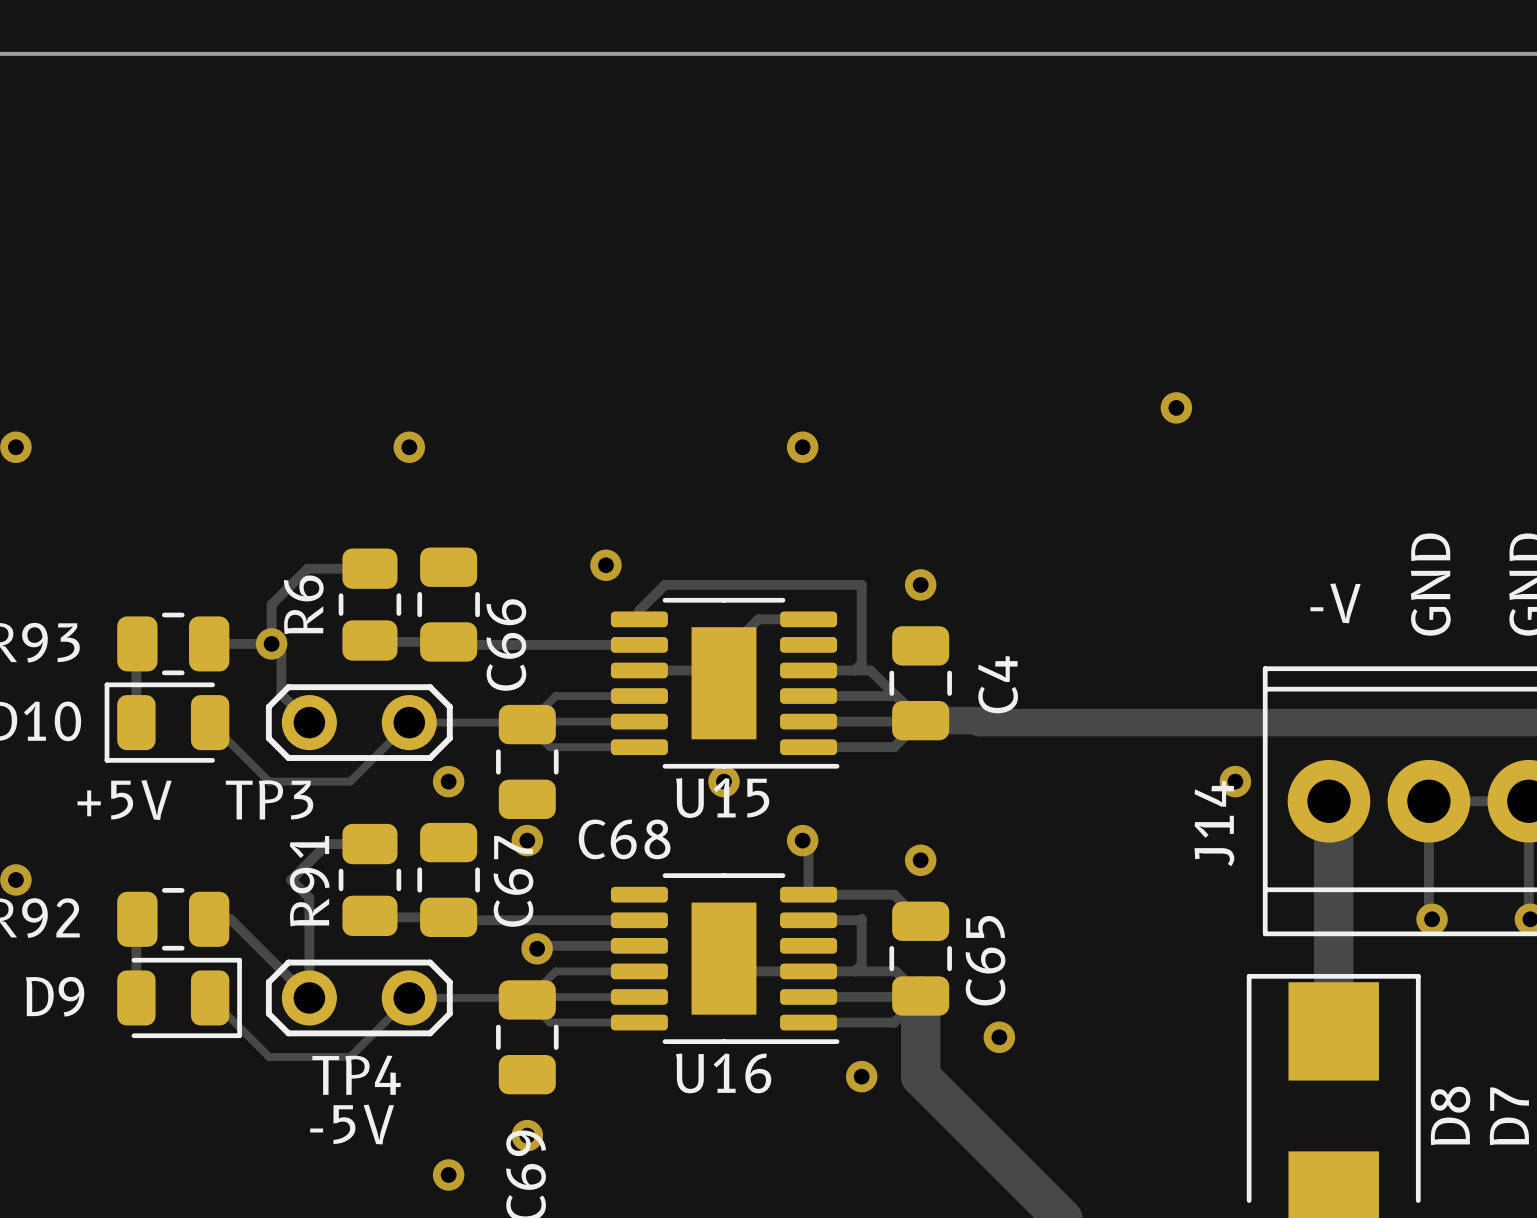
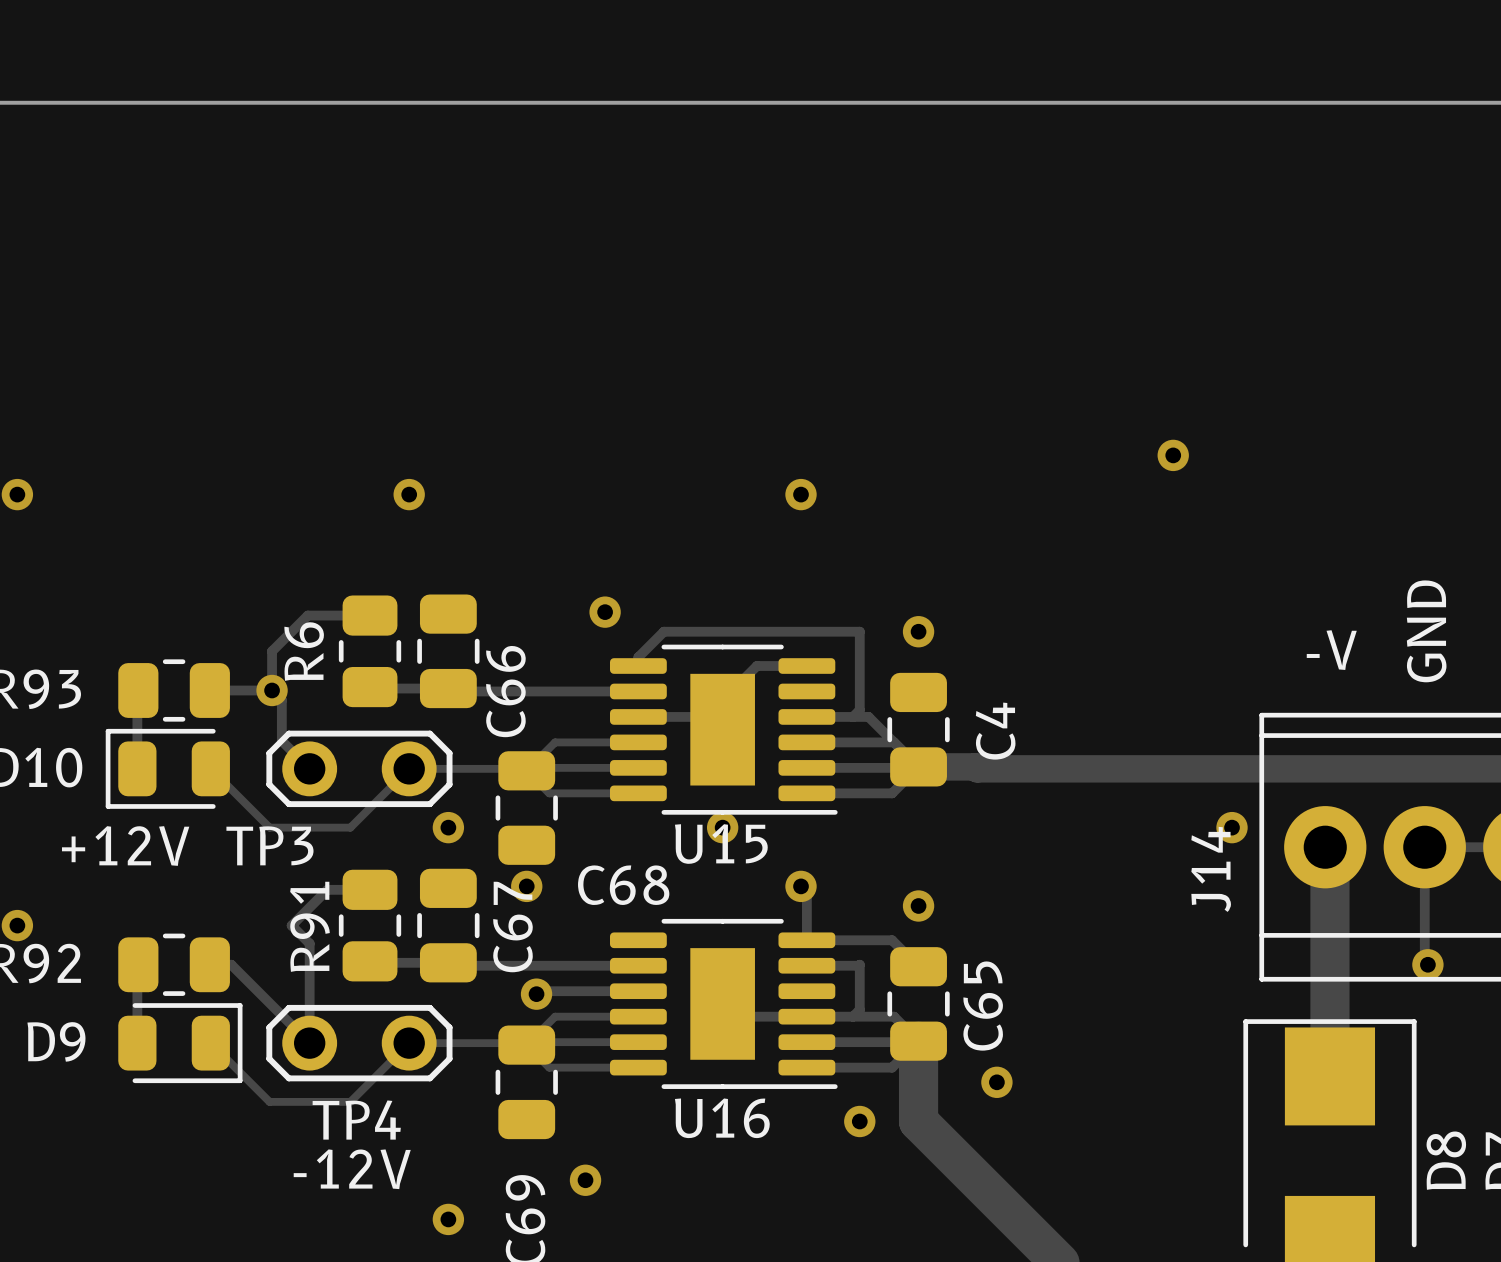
text: +5V (124, 800) -> +12V (125, 846)
text: -5V (352, 1124) -> -12V (352, 1169)
via position: (527, 1135) -> (585, 1180)

